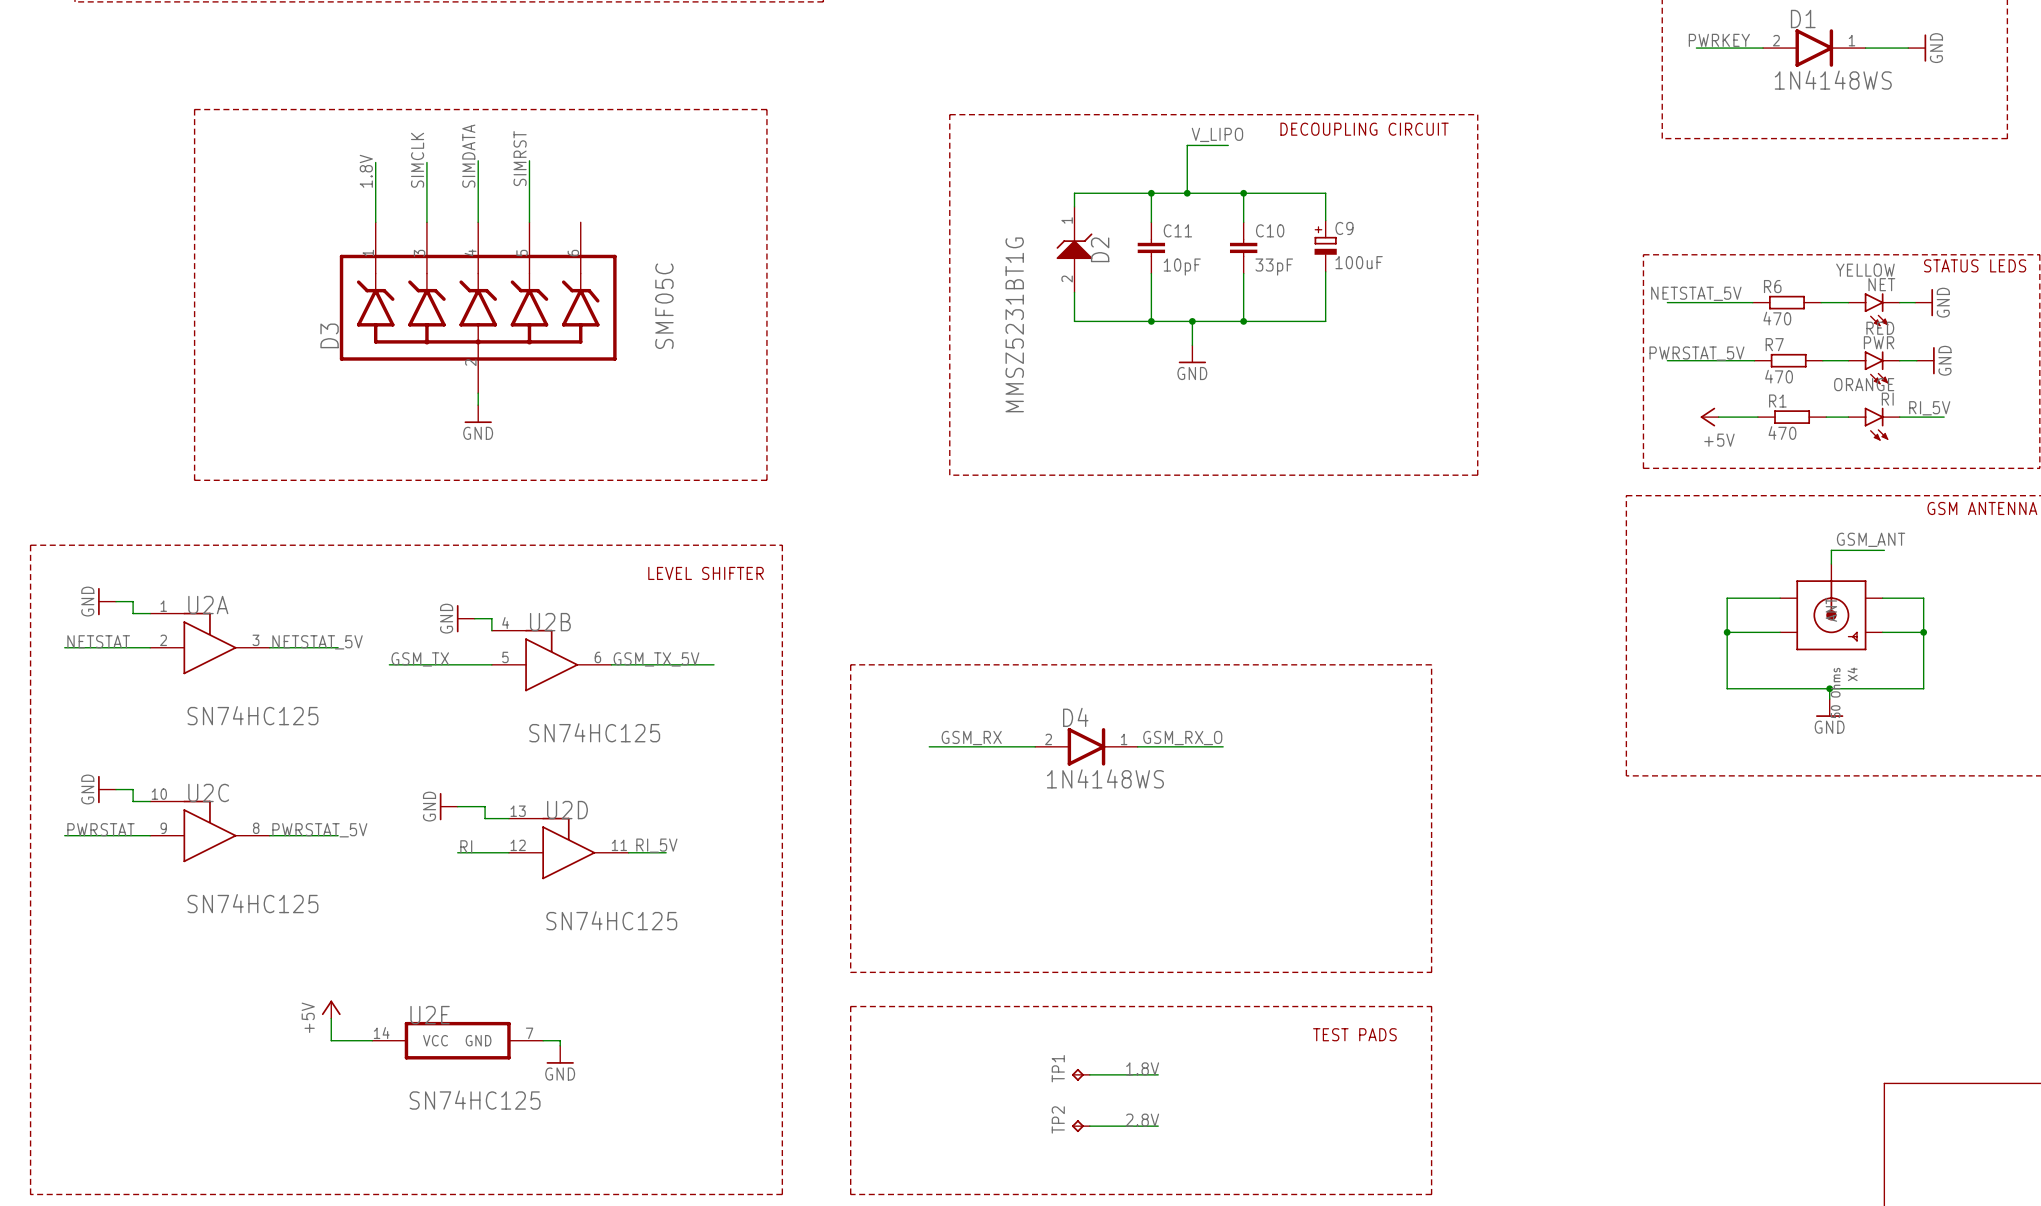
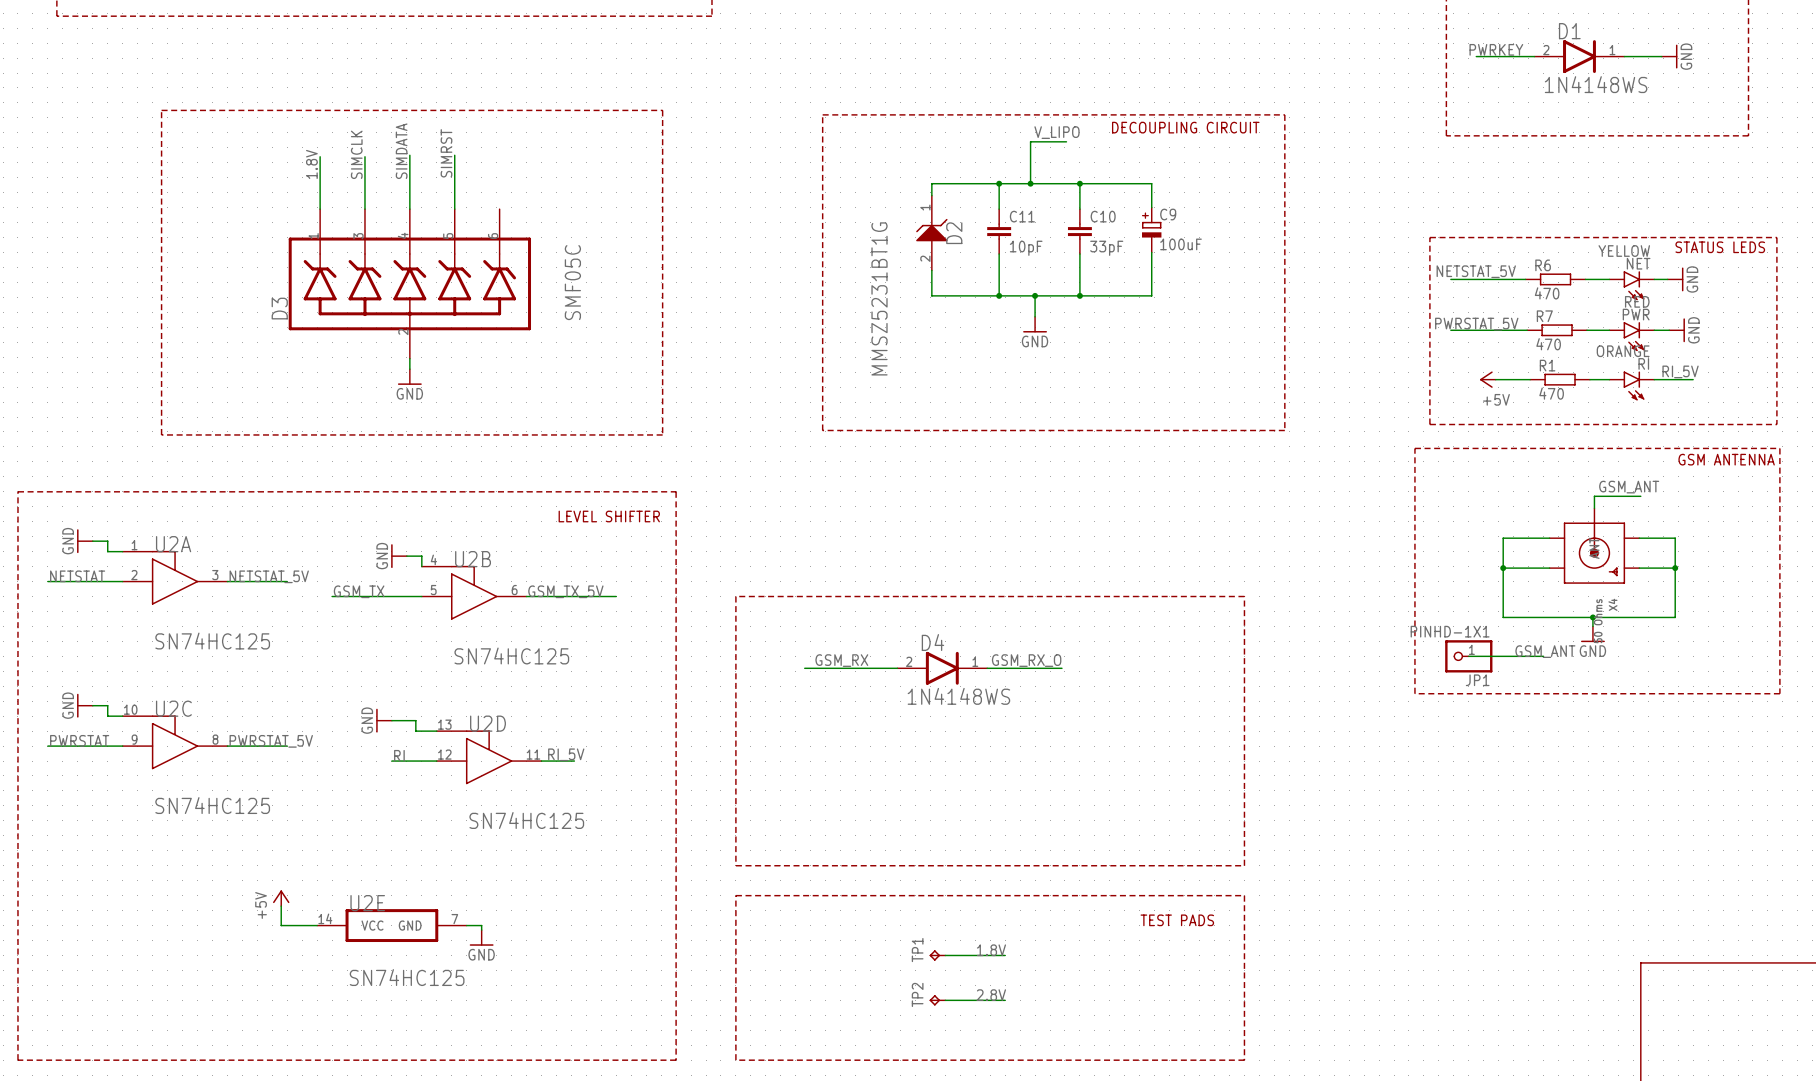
label: none -> GSM_ANT (1545, 651)
wire: none -> (1468, 656) (1543, 656)
JP1: none -> PINHD-1X1 (1468, 656)

